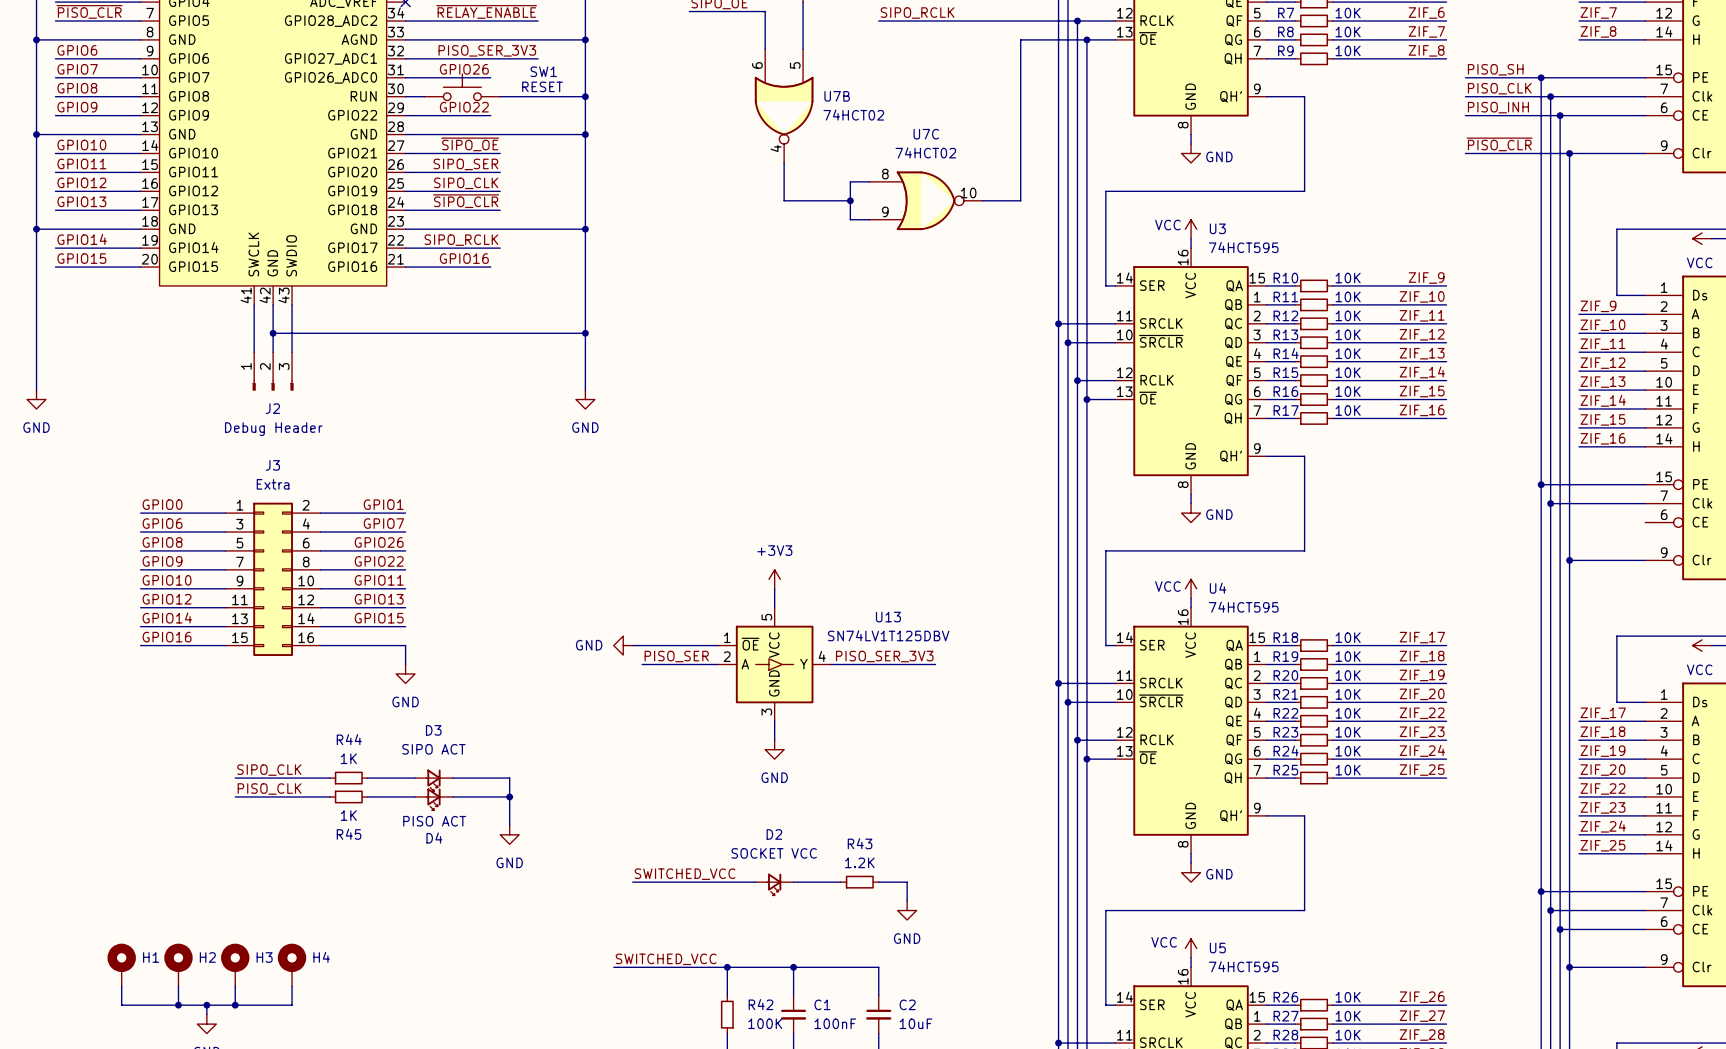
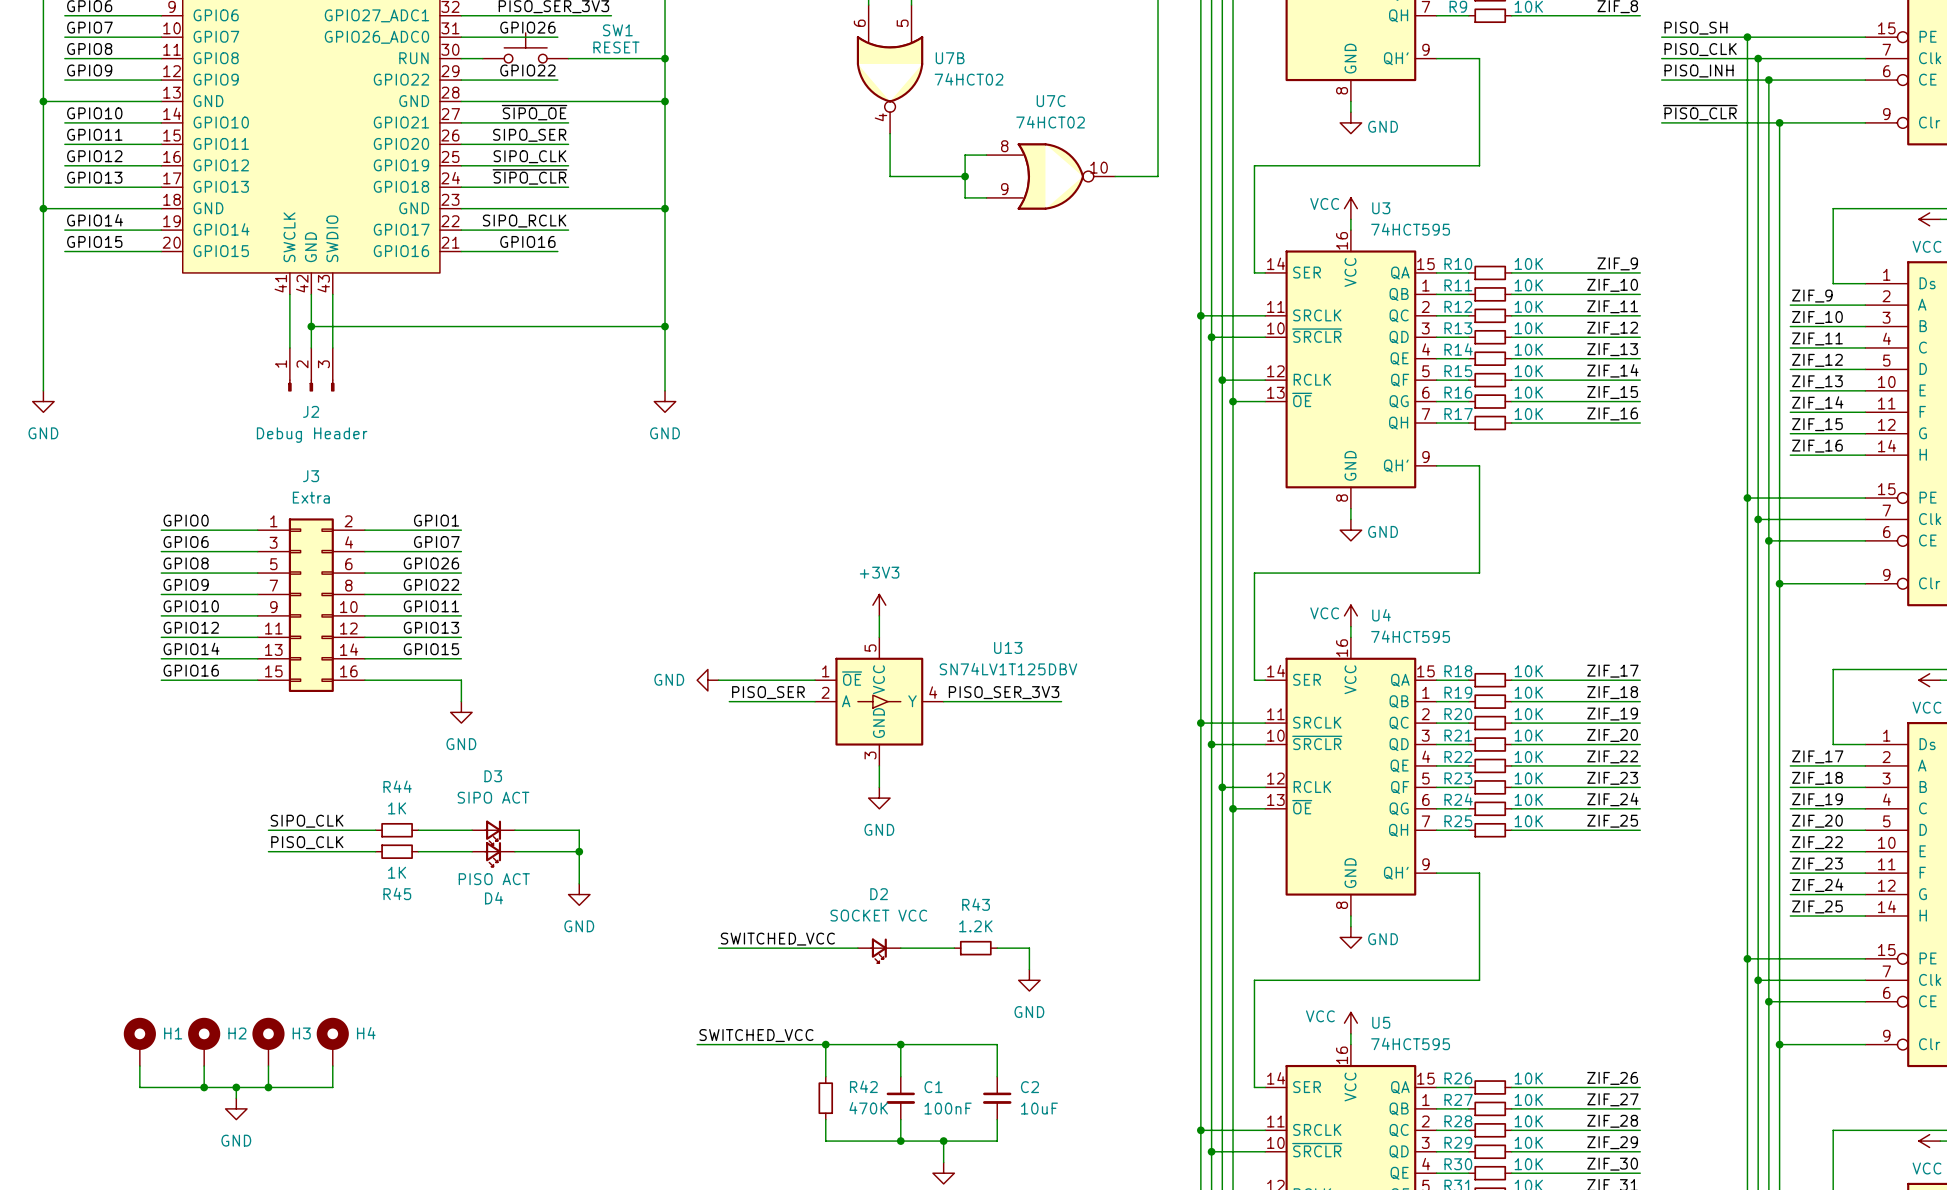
wire: none -> (1768, 540) (1865, 540)
junction: none -> (1768, 540)
R42 value: 100K (765, 1023) -> 470K (868, 1108)

